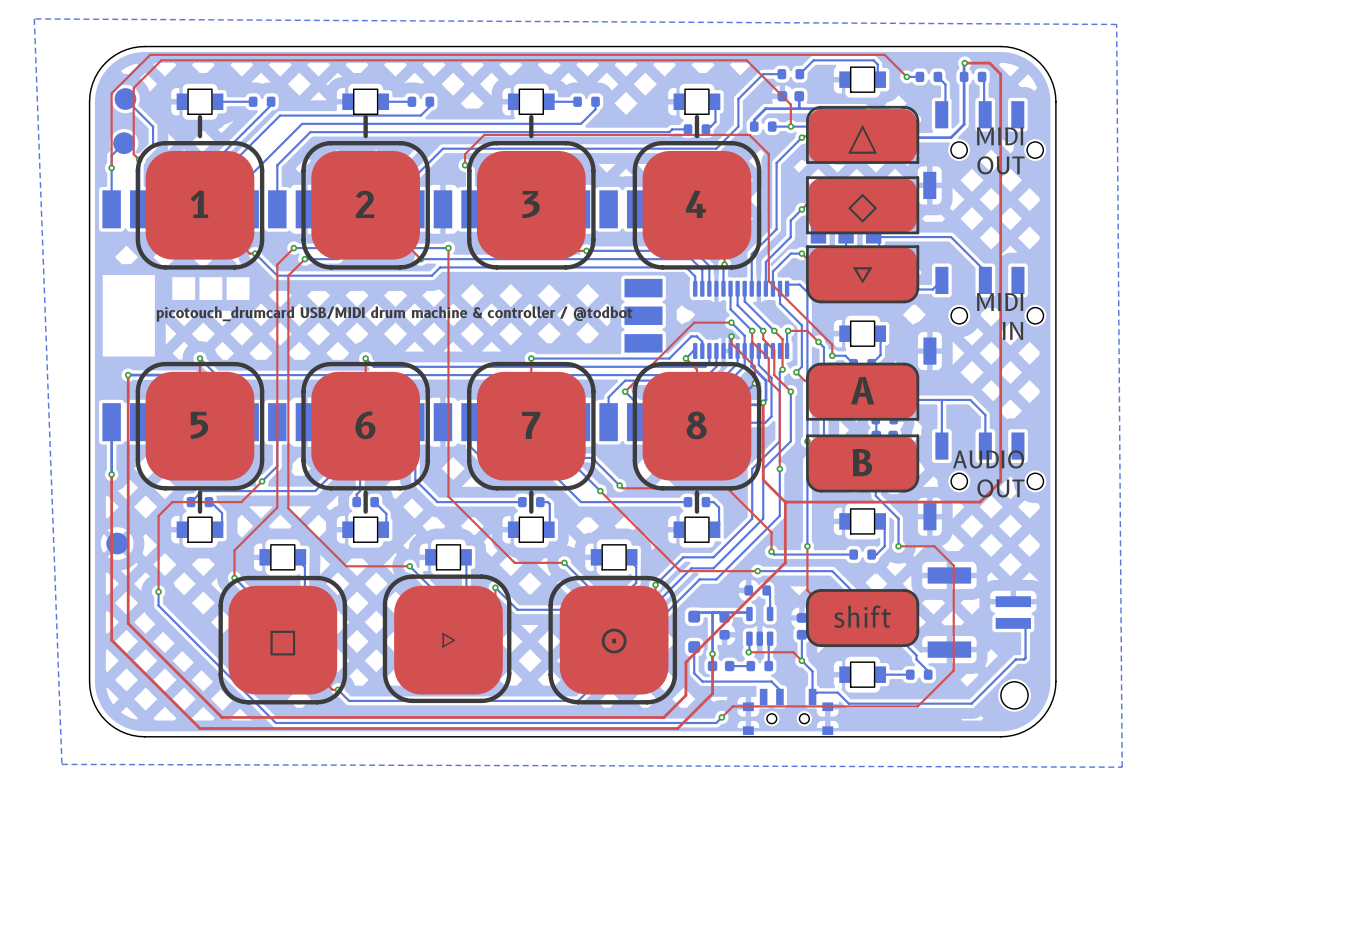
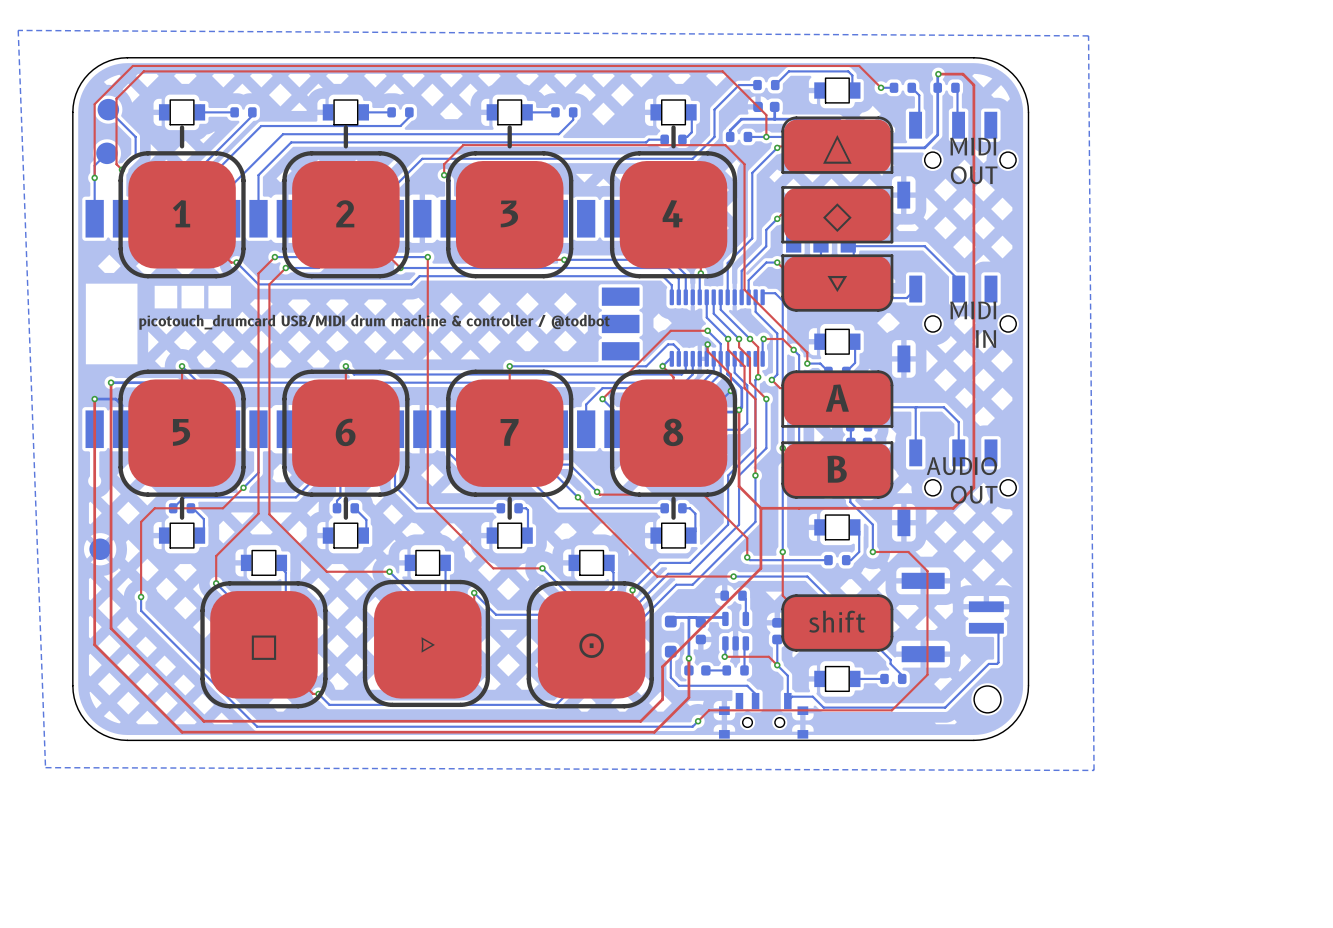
top track: none -> (94, 399) (94, 480)
bottom track: none -> (94, 399) (115, 399) (121, 405) (121, 419)
via: none -> (94, 399)
bottom track: (111, 412) (111, 474) -> none
via: (111, 474) -> none

